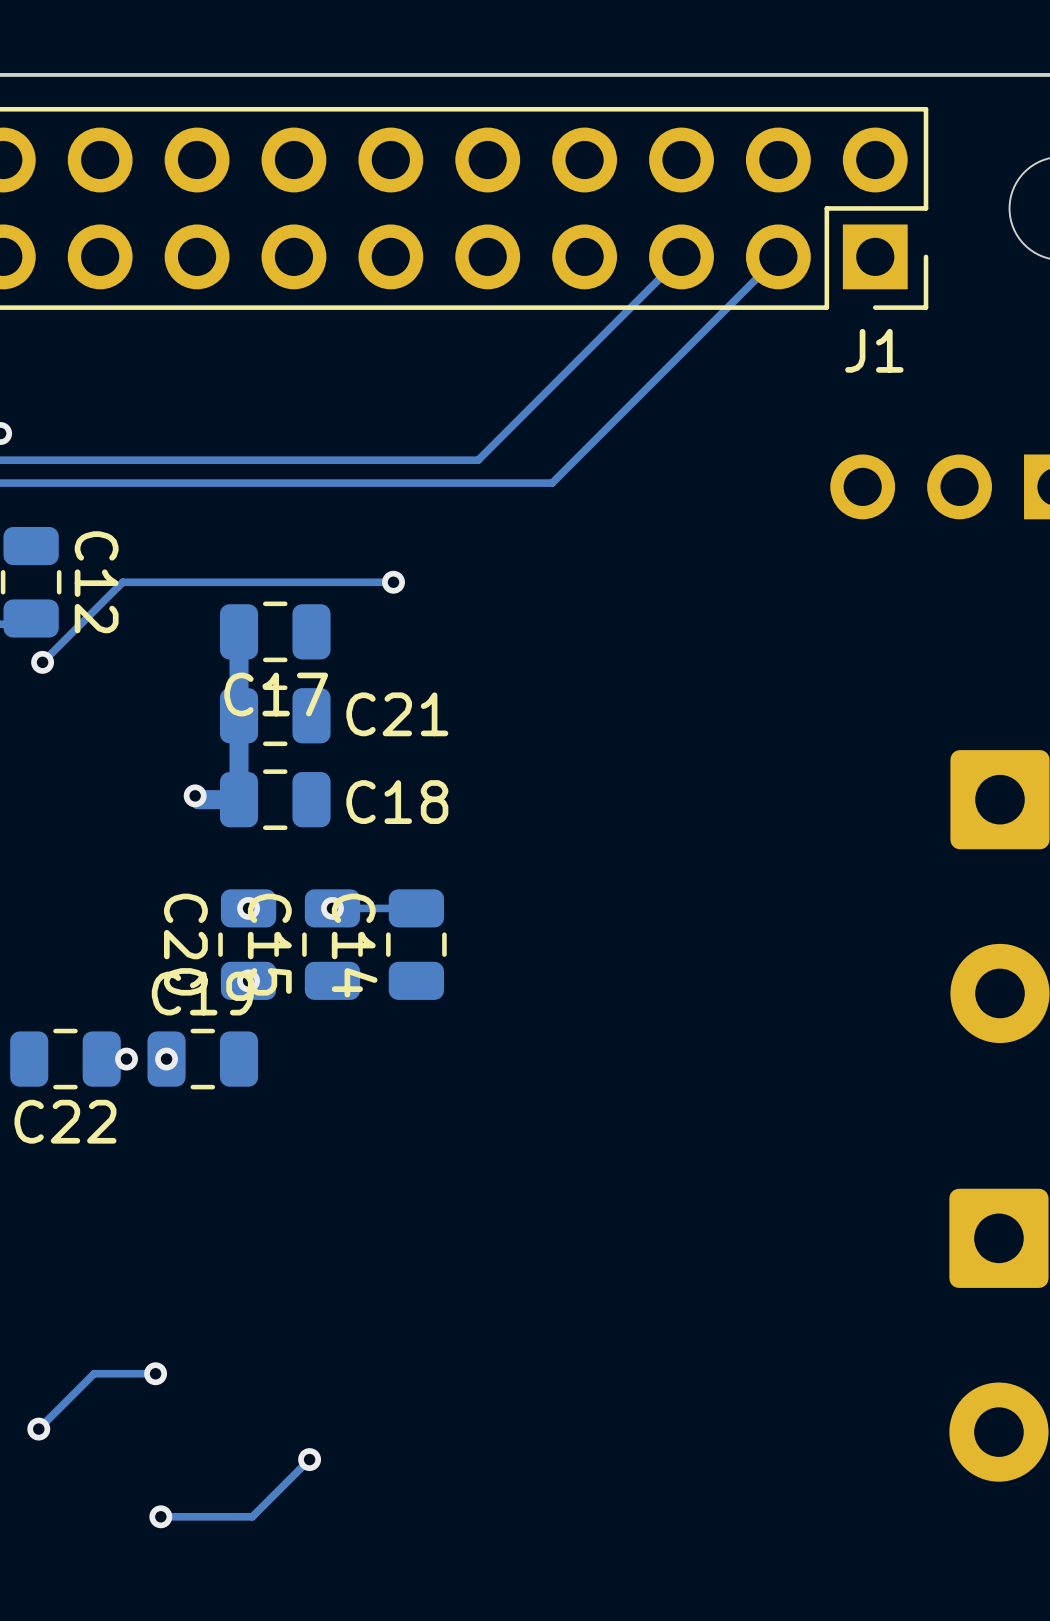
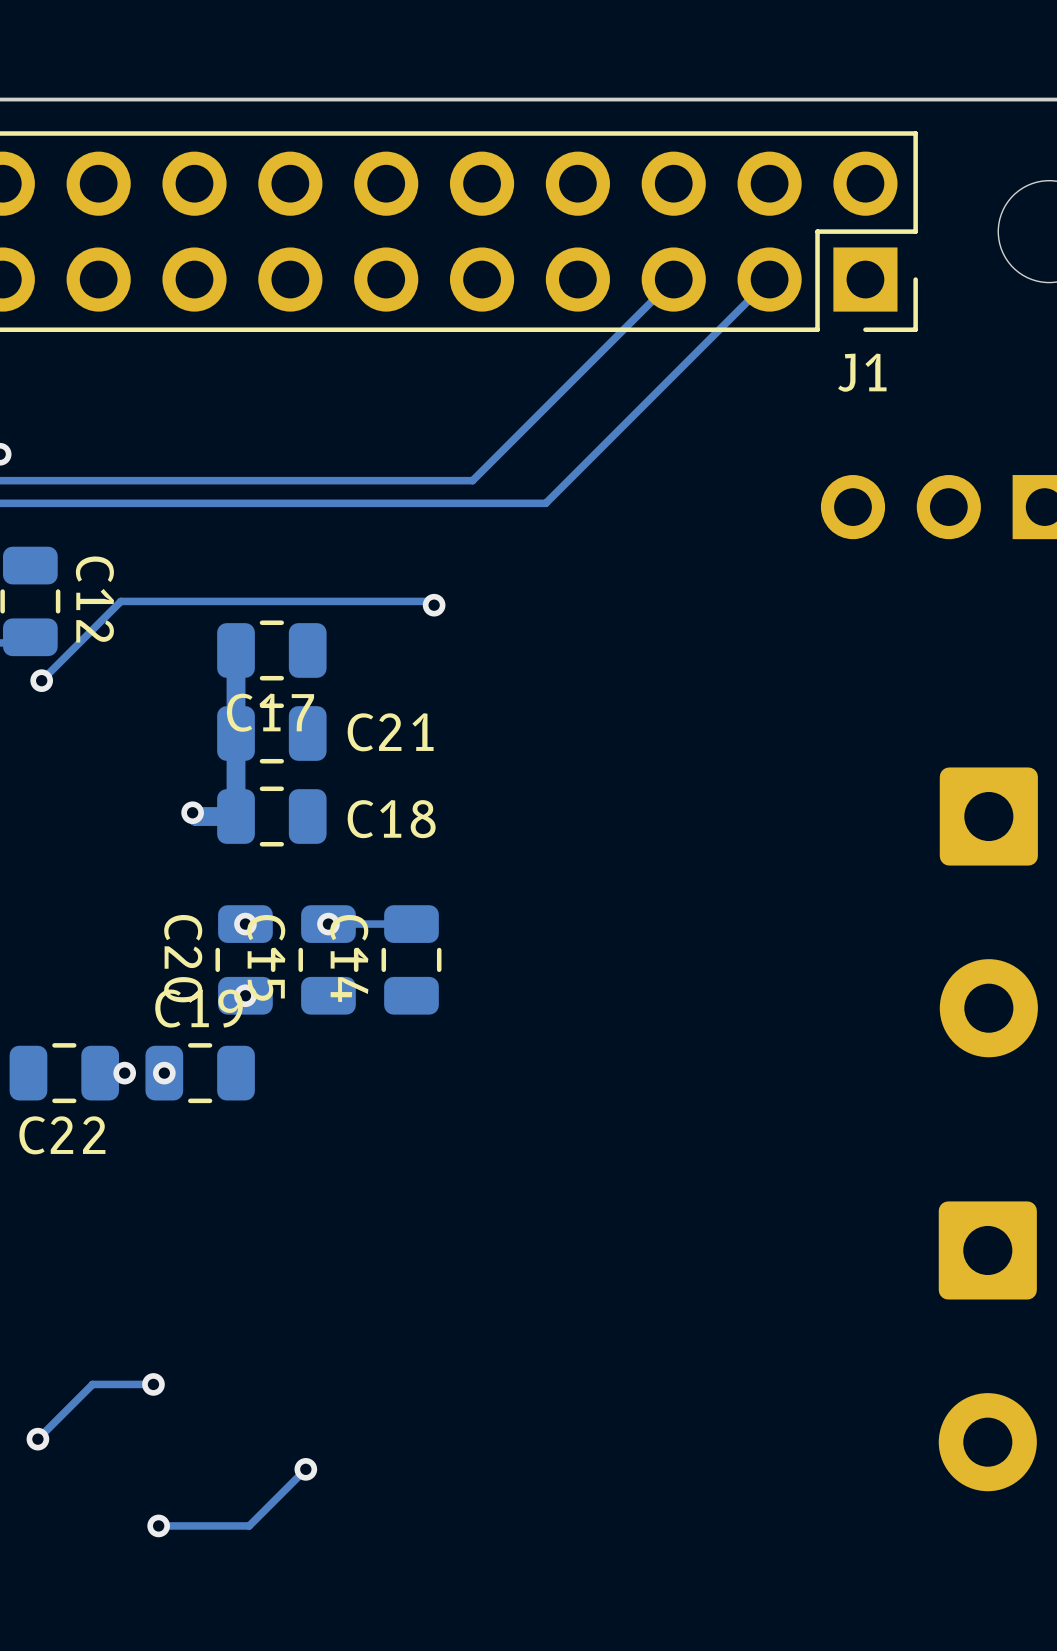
track: none -> (388, 601) (430, 601) (434, 605)
via position: (393, 582) -> (434, 605)

